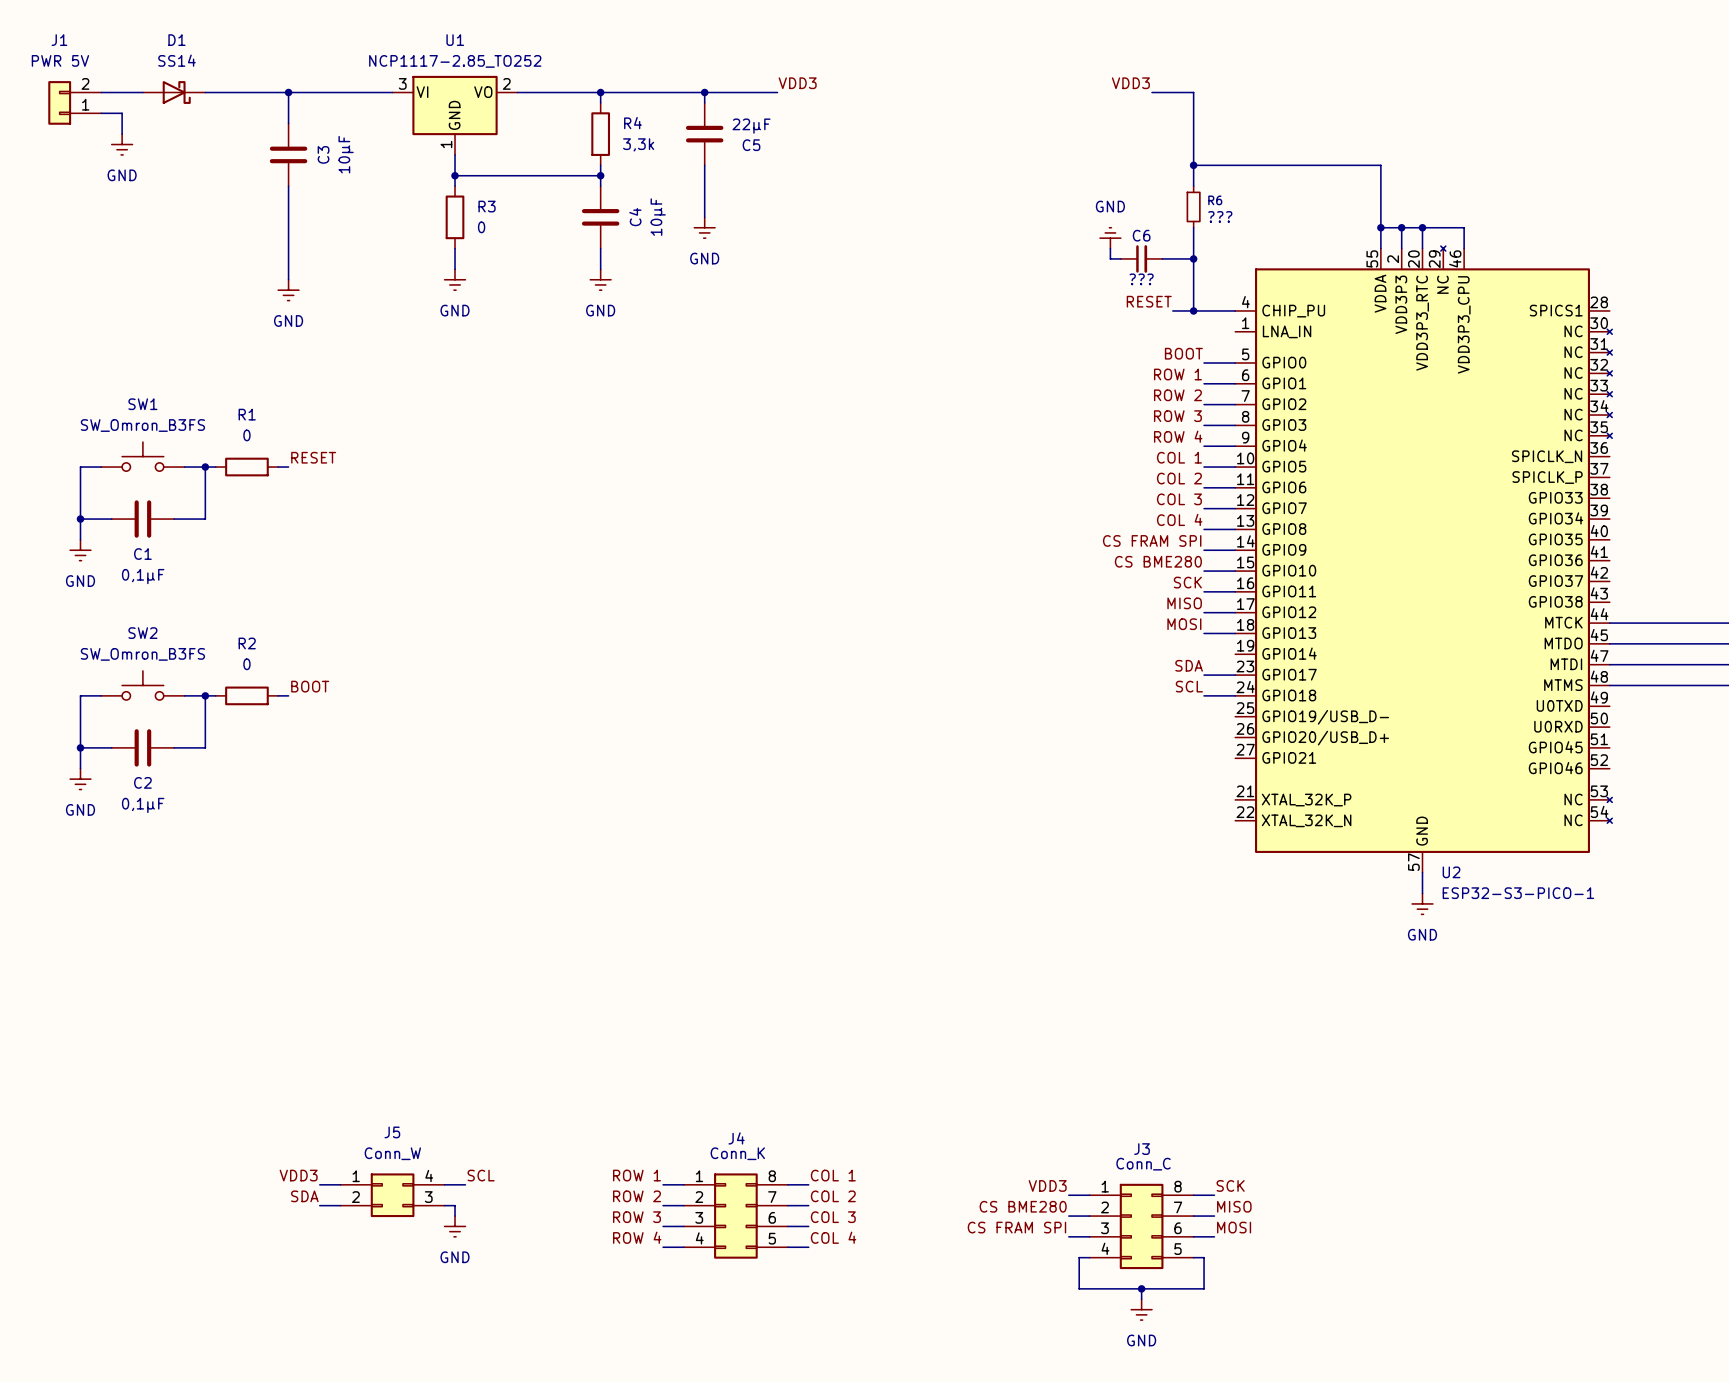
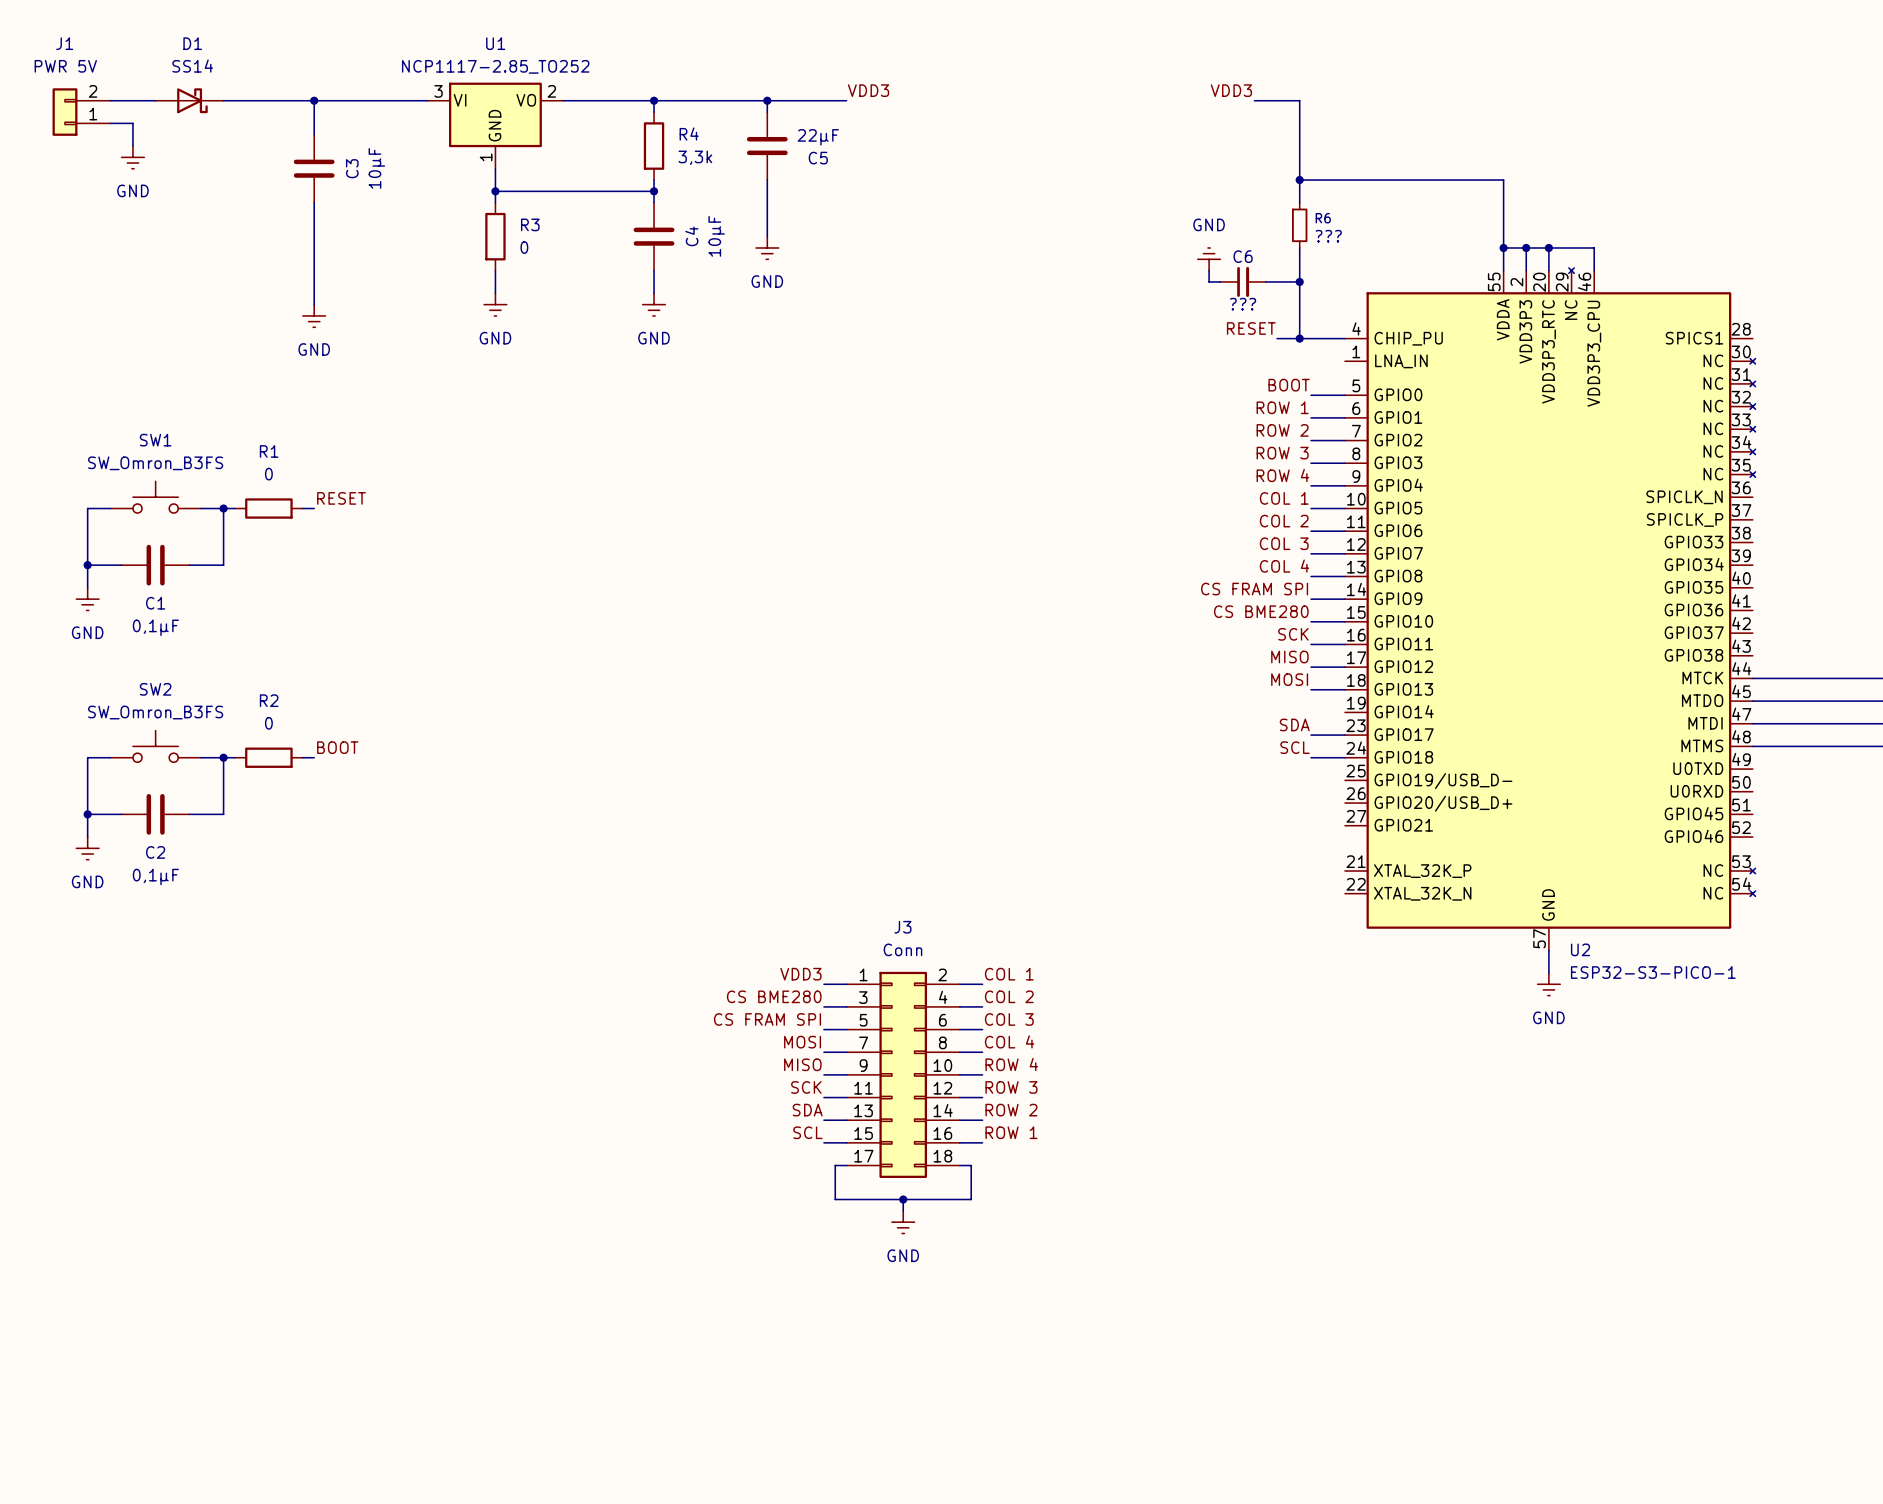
label: none -> VDD3 (800, 974)
label: none -> COL 1 (1009, 974)
wire: none -> (823, 984) (846, 984)
wire: none -> (959, 984) (982, 984)
label: none -> CS BME280 (774, 996)
label: none -> COL 2 (1009, 996)
wire: none -> (823, 1006) (846, 1006)
wire: none -> (959, 1006) (982, 1006)
label: none -> CS FRAM SPI (767, 1019)
label: none -> COL 3 (1009, 1019)
wire: none -> (823, 1029) (846, 1029)
wire: none -> (959, 1029) (982, 1029)
label: none -> COL 4 (1009, 1041)
label: none -> MOSI (802, 1042)
wire: none -> (823, 1052) (846, 1052)
wire: none -> (959, 1052) (982, 1052)
label: none -> MISO (802, 1064)
label: none -> ROW 4 (1011, 1064)
wire: none -> (823, 1074) (846, 1074)
wire: none -> (959, 1074) (982, 1074)
label: none -> SCK (806, 1087)
label: none -> ROW 3 (1011, 1087)
label: none -> SDA (807, 1110)
label: none -> ROW 2 (1011, 1110)
label: none -> SCL (807, 1132)
label: none -> ROW 1 (1011, 1132)
wire: none -> (846, 1165) (835, 1165) (835, 1199) (971, 1199) (971, 1165) (959, 1165)
wire: none -> (903, 1199) (903, 1210)
junction: none -> (903, 1199)
power symbol: none -> GND (903, 1222)
J3 name position: J3 (1142, 1149) -> J3 (902, 927)
J3 value: Conn_C (1143, 1164) -> Conn (902, 949)
label: VDD3 (298, 1175) -> none
label: SCL (481, 1175) -> none
label: ROW 1 (636, 1175) -> none
label: COL 1 (833, 1175) -> none
J3 symbol: [1089, 1183, 1194, 1270] -> [846, 971, 960, 1178]
wire: (319, 1184) (340, 1184) -> none
wire: (444, 1184) (465, 1184) -> none
wire: (663, 1184) (683, 1184) -> (823, 1097) (846, 1097)
wire: (787, 1184) (808, 1184) -> (959, 1097) (982, 1097)
label: VDD3 (1047, 1185) -> none
label: SCK (1230, 1185) -> none
J5: Conn_W (392, 1195) -> none
wire: (1068, 1195) (1089, 1195) -> none
wire: (1193, 1195) (1214, 1195) -> none
label: SDA (304, 1196) -> none
label: ROW 2 (636, 1196) -> none
label: COL 2 (833, 1196) -> none
wire: (319, 1205) (340, 1205) -> none
wire: (444, 1205) (455, 1205) (455, 1216) -> none
wire: (663, 1205) (683, 1205) -> (823, 1120) (846, 1120)
wire: (787, 1205) (808, 1205) -> (959, 1120) (982, 1120)
label: CS BME280 (1023, 1206) -> none
label: MISO (1234, 1206) -> none
J4: Conn_K (735, 1216) -> none
wire: (1068, 1216) (1089, 1216) -> none
wire: (1193, 1216) (1214, 1216) -> none
label: ROW 3 (636, 1217) -> none
label: COL 3 (833, 1217) -> none
power symbol: GND (455, 1226) -> none
wire: (663, 1226) (683, 1226) -> (823, 1142) (846, 1142)
wire: (787, 1226) (808, 1226) -> (959, 1142) (982, 1142)
label: CS FRAM SPI (1016, 1227) -> none
label: MOSI (1234, 1227) -> none
wire: (1068, 1236) (1089, 1236) -> none
wire: (1193, 1236) (1214, 1236) -> none
label: ROW 4 (637, 1237) -> none
label: COL 4 (833, 1237) -> none
wire: (663, 1247) (683, 1247) -> none
wire: (787, 1247) (808, 1247) -> none
wire: (1089, 1257) (1079, 1257) (1079, 1288) (1204, 1288) (1204, 1257) (1193, 1257) -> none
wire: (1141, 1288) (1141, 1299) -> none
junction: (1141, 1288) -> none
power symbol: GND (1141, 1309) -> none

